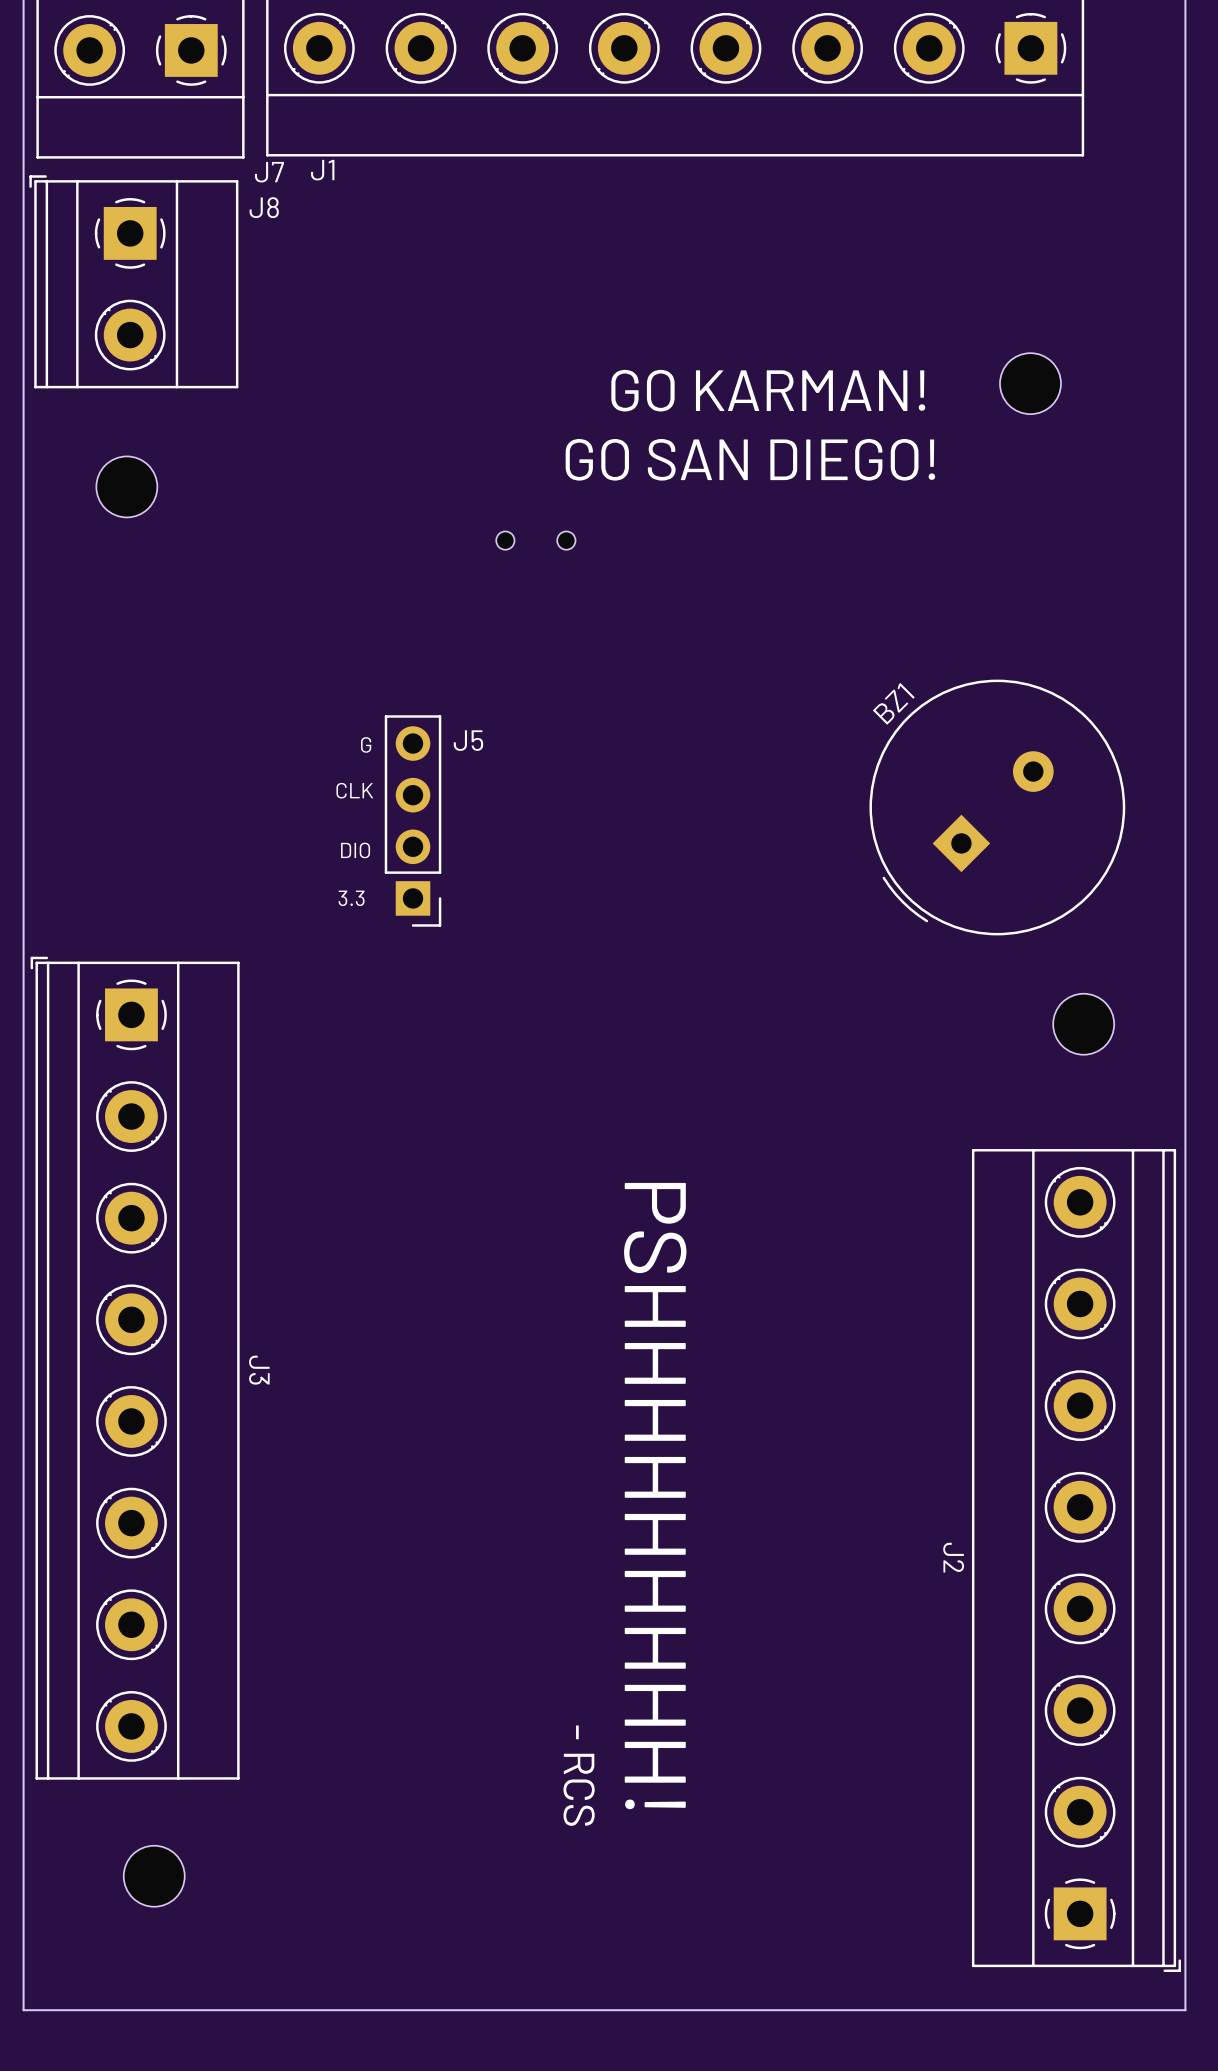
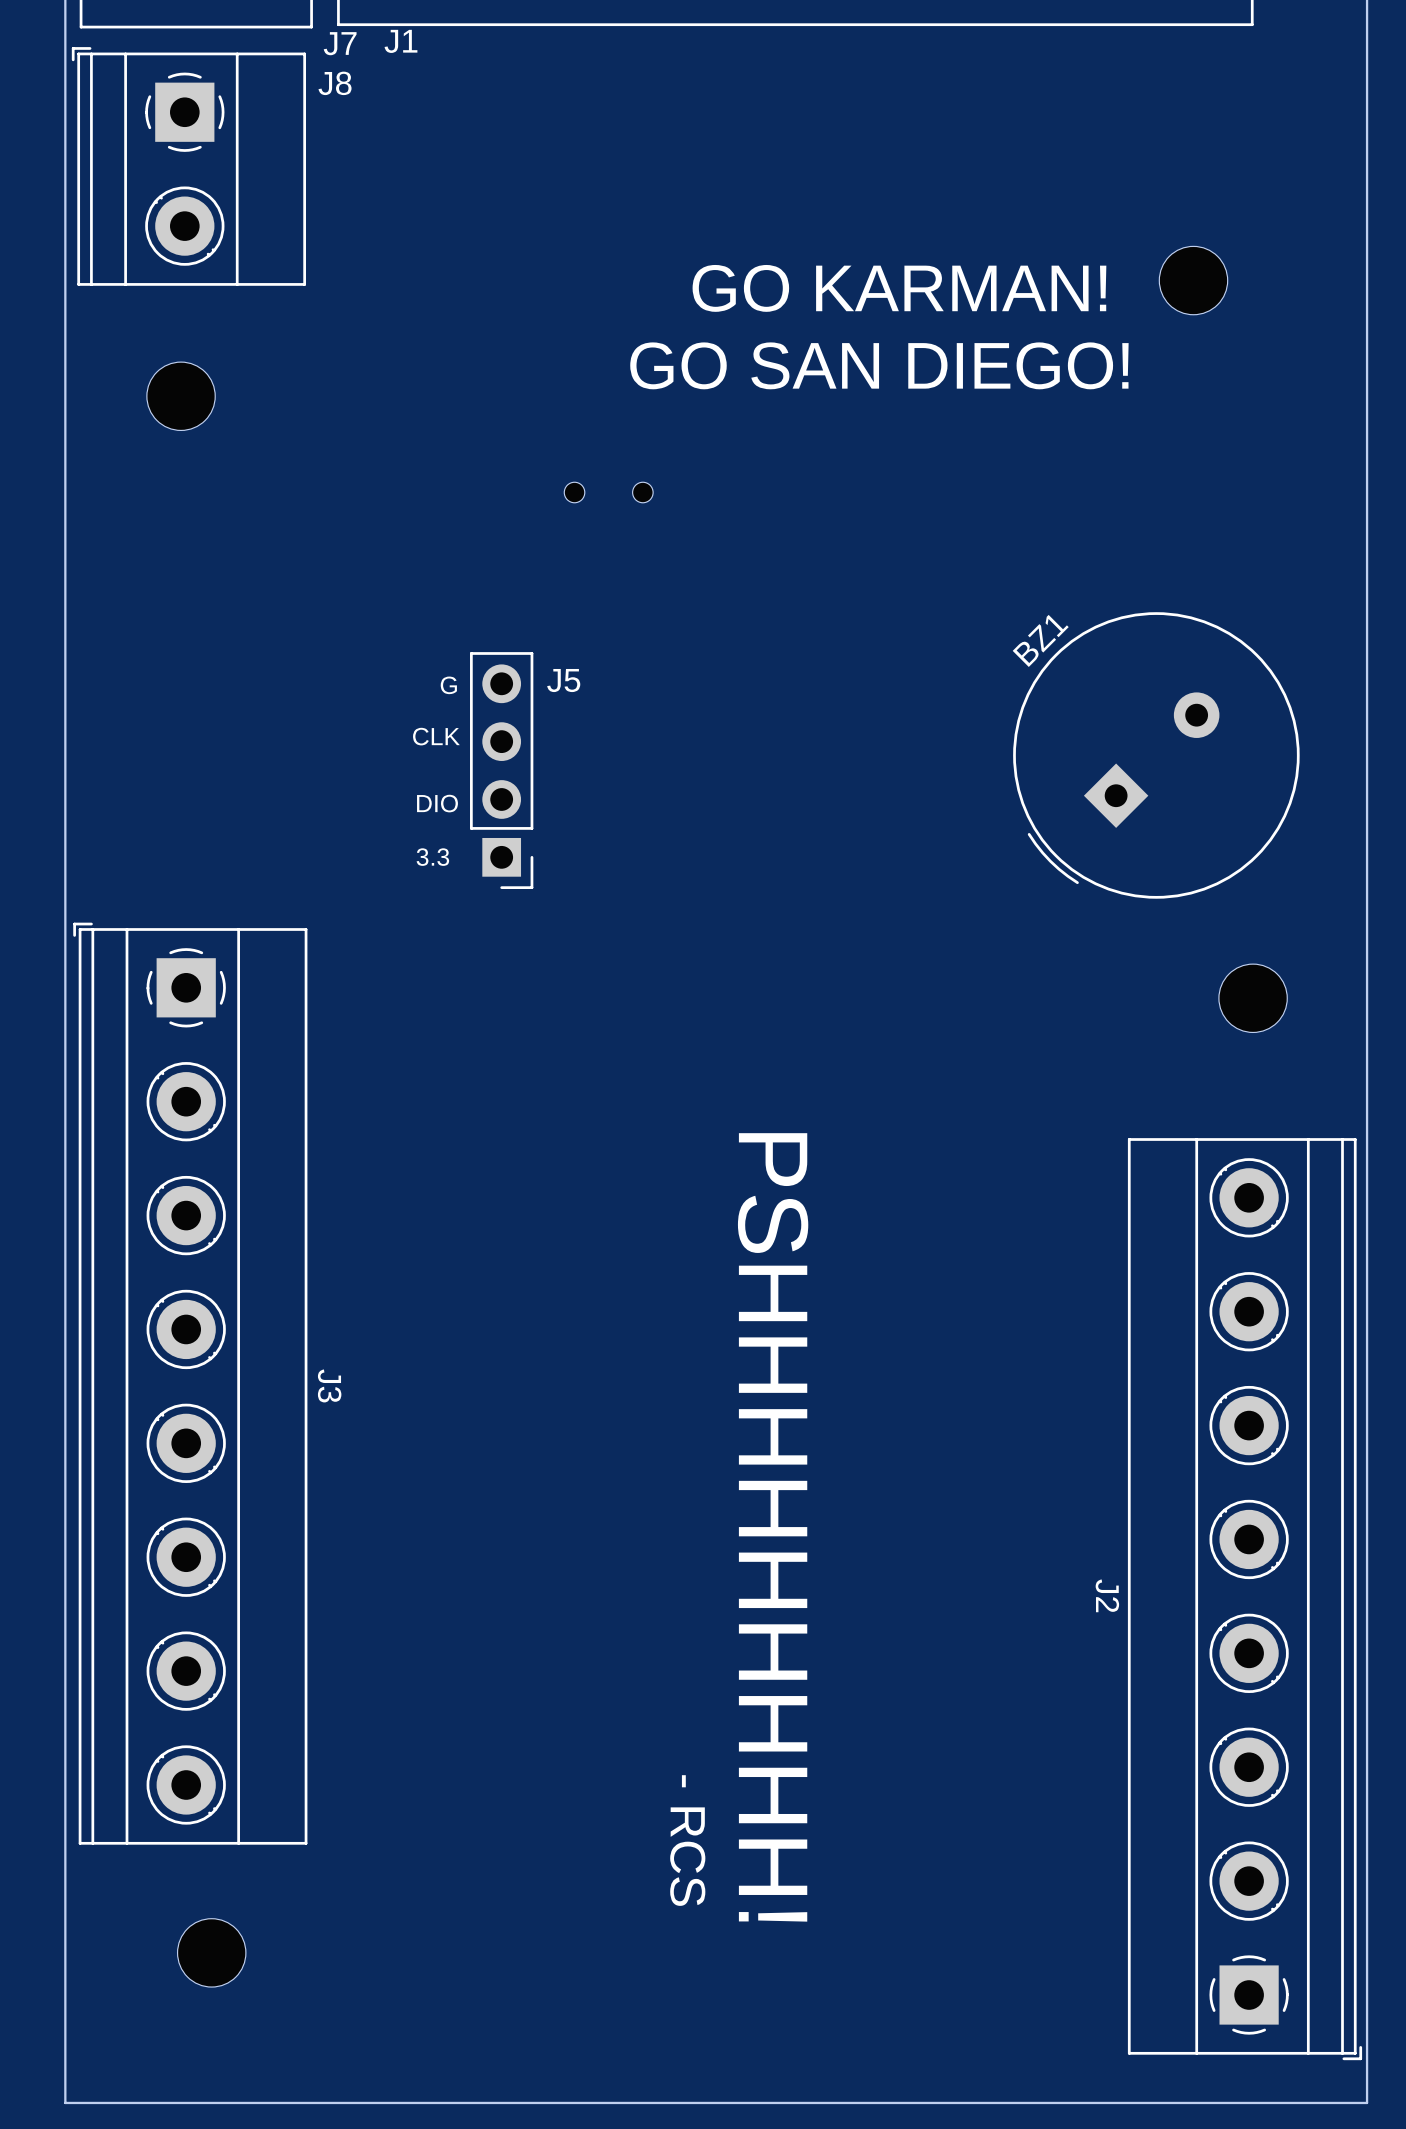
part position: (535, 540) -> (608, 492)

